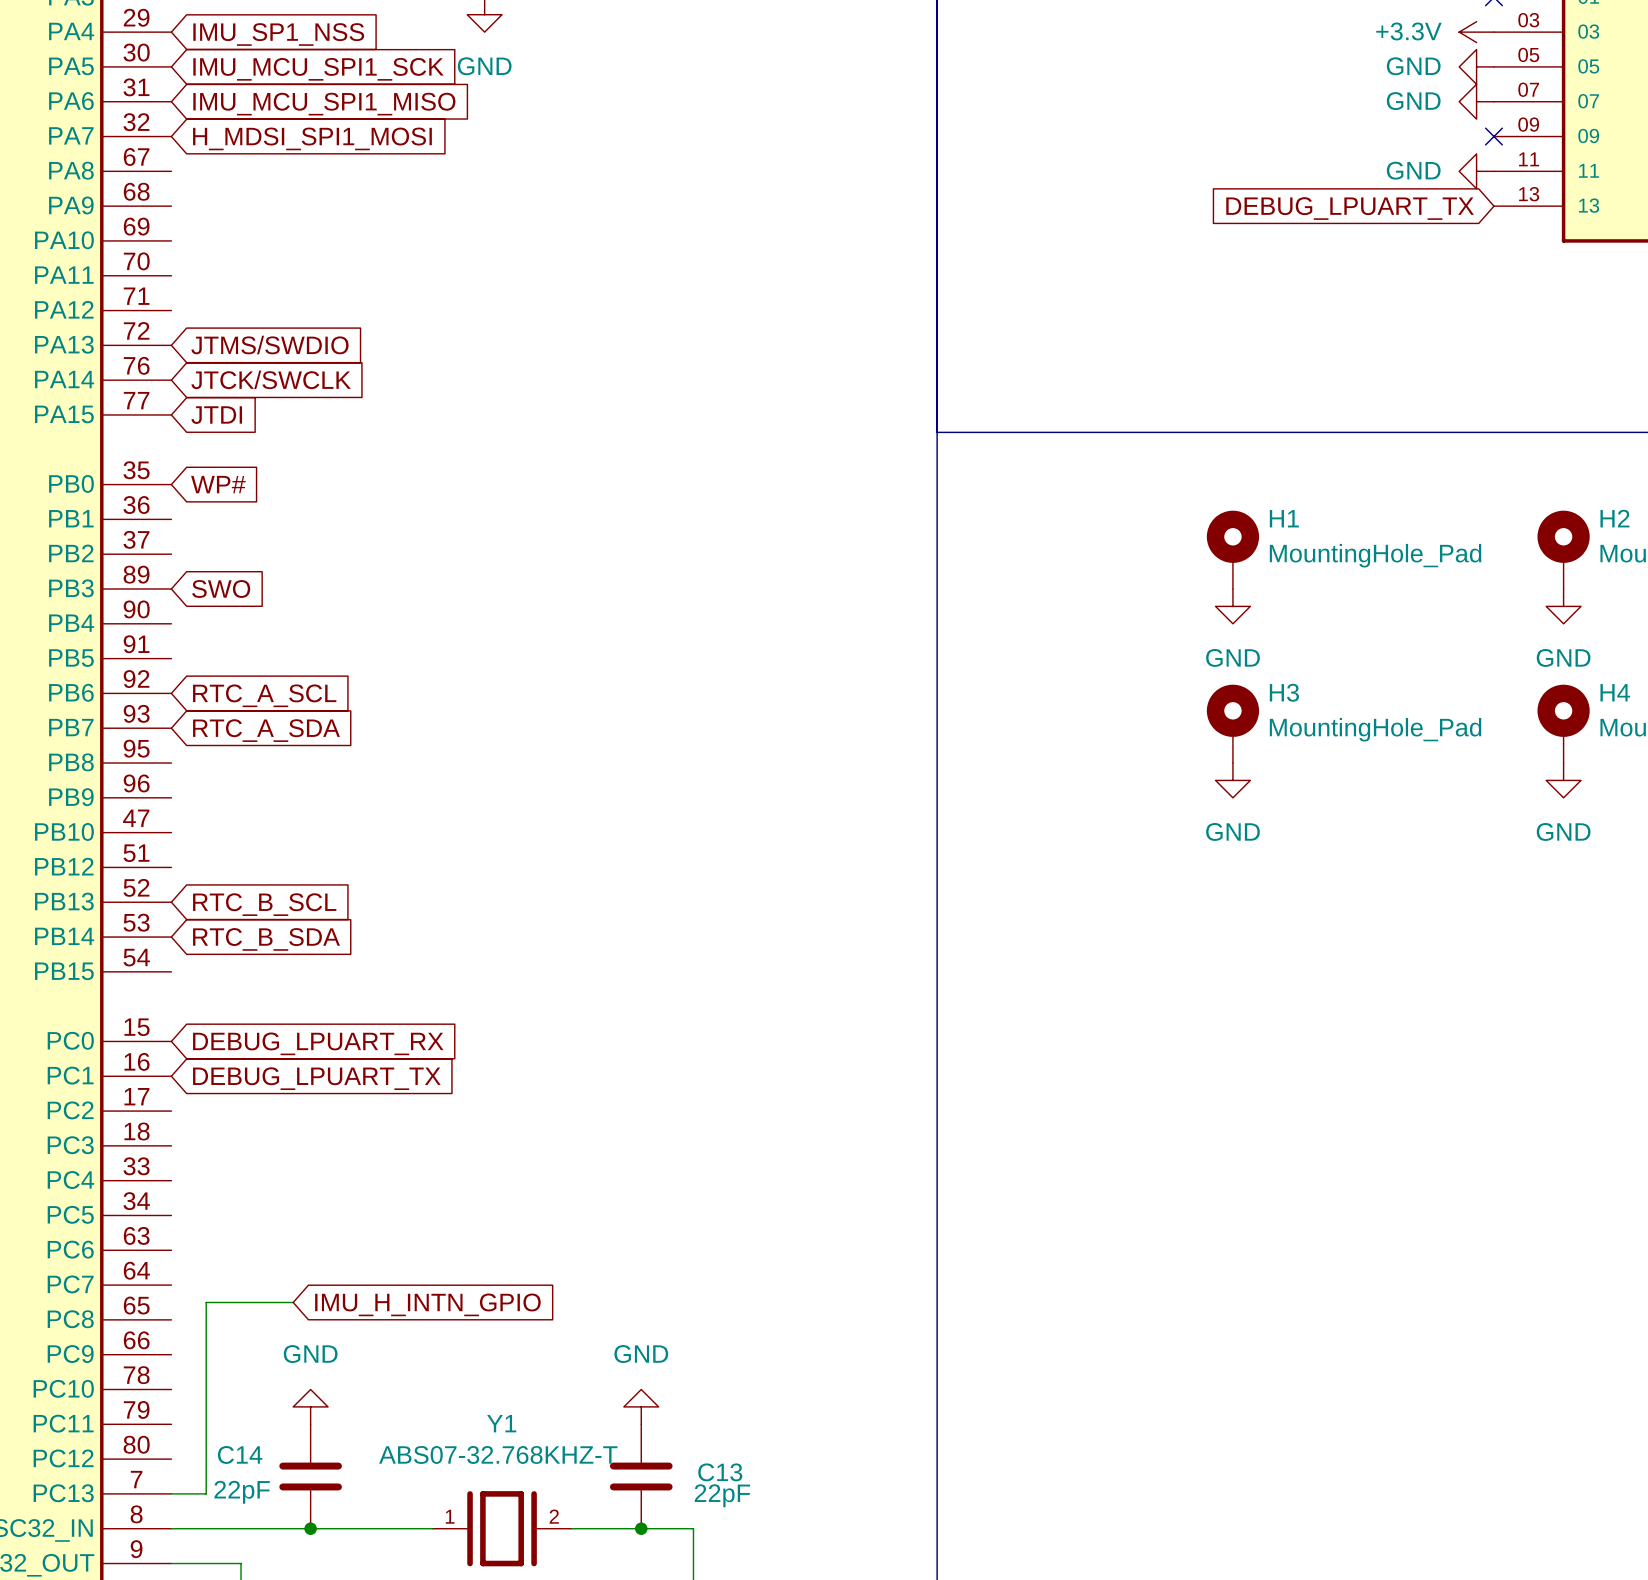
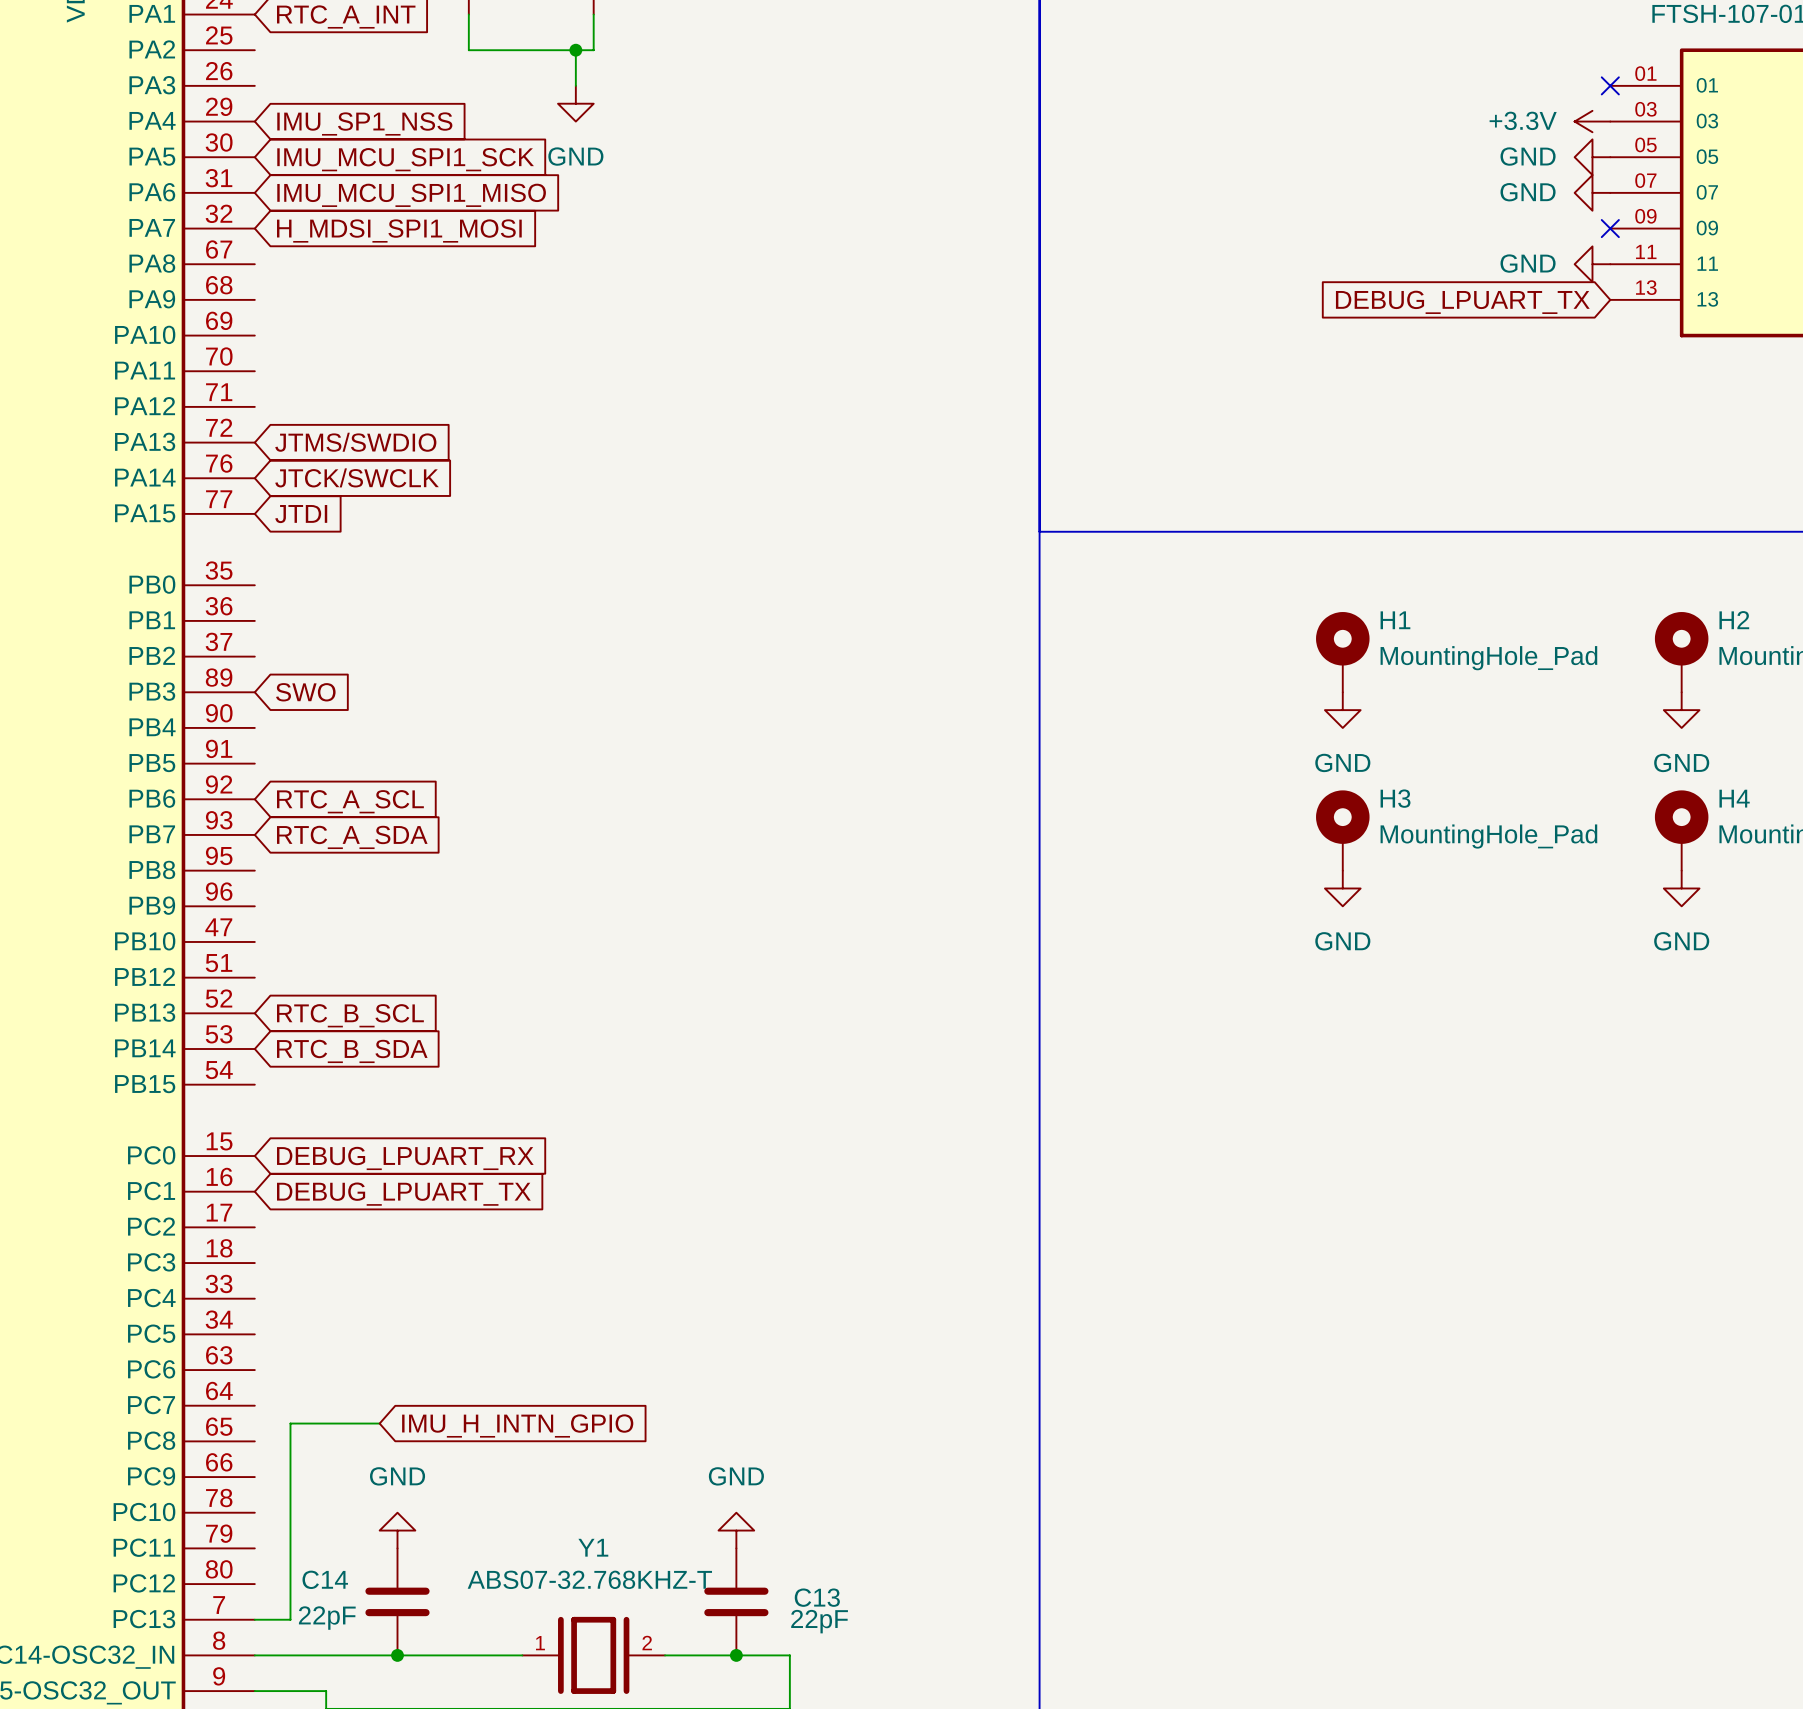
global label: WP# (218, 484) -> none

